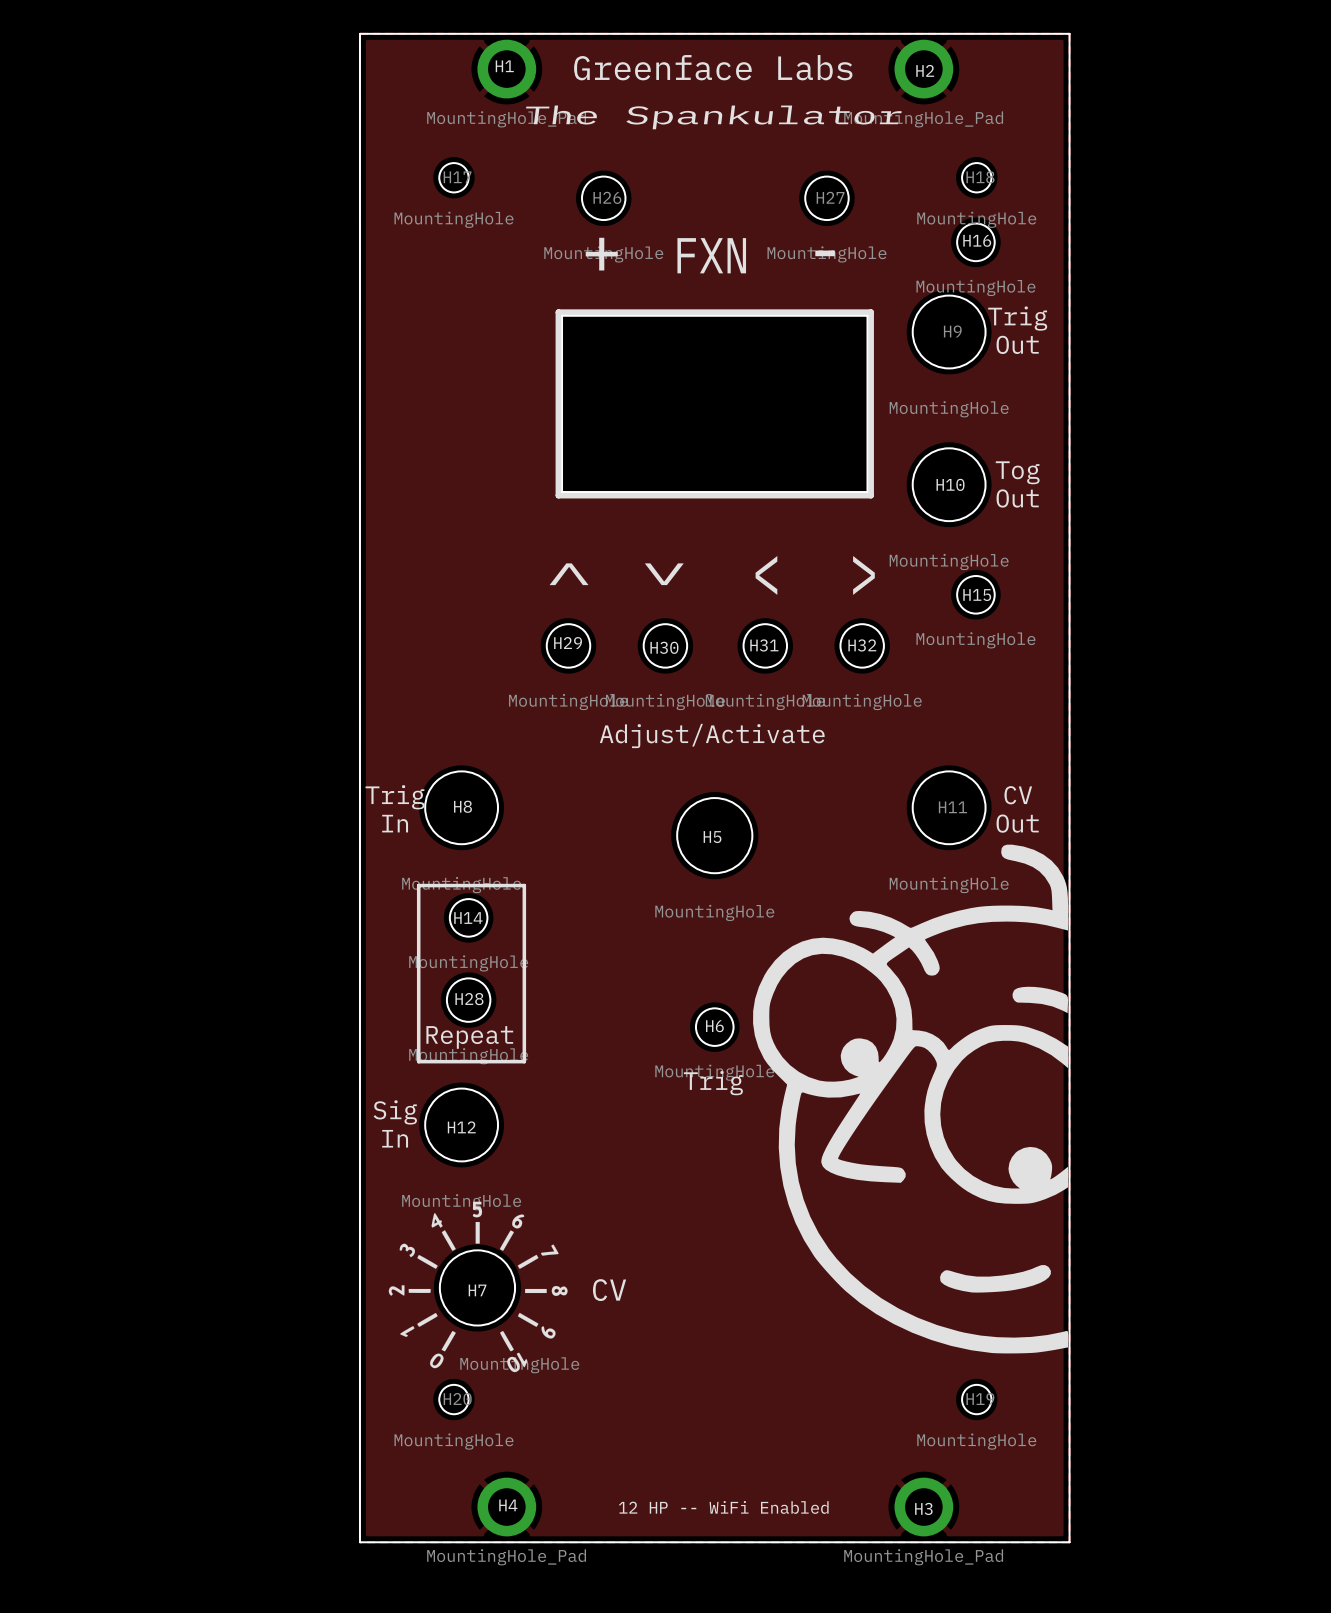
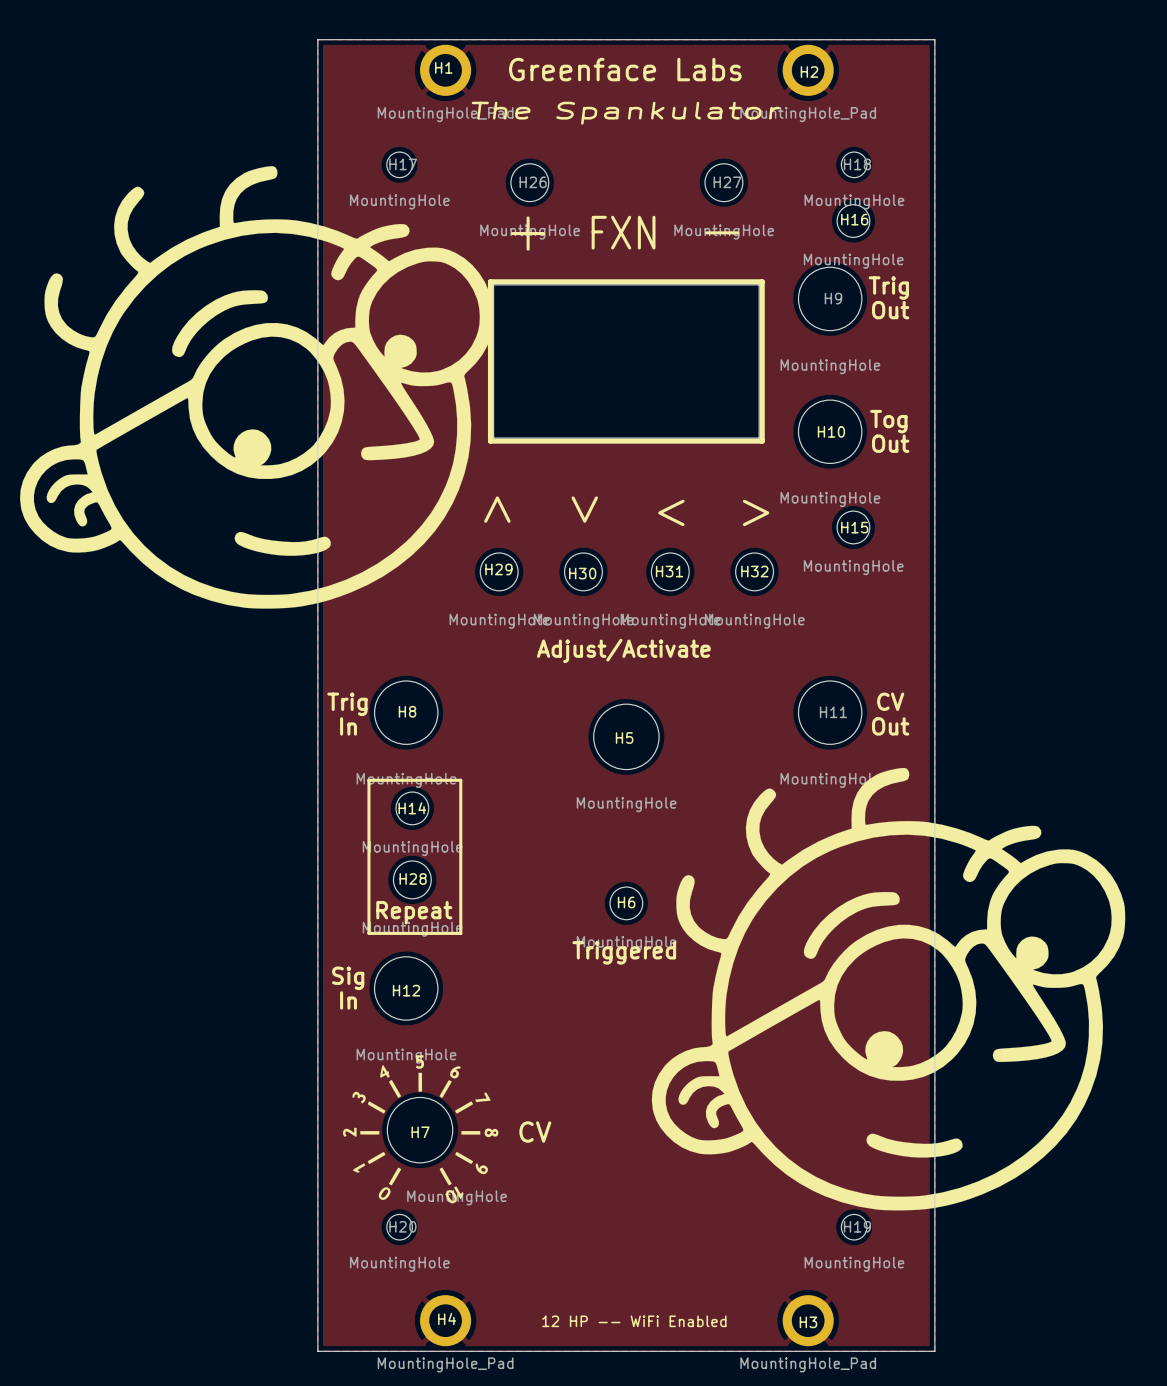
drawing: none -> [19, 166, 494, 609]
drawing: [753, 844, 1069, 1354] -> none
drawing: none -> [651, 767, 1126, 1211]
text: Trig (713, 1083) -> Triggered (624, 952)

